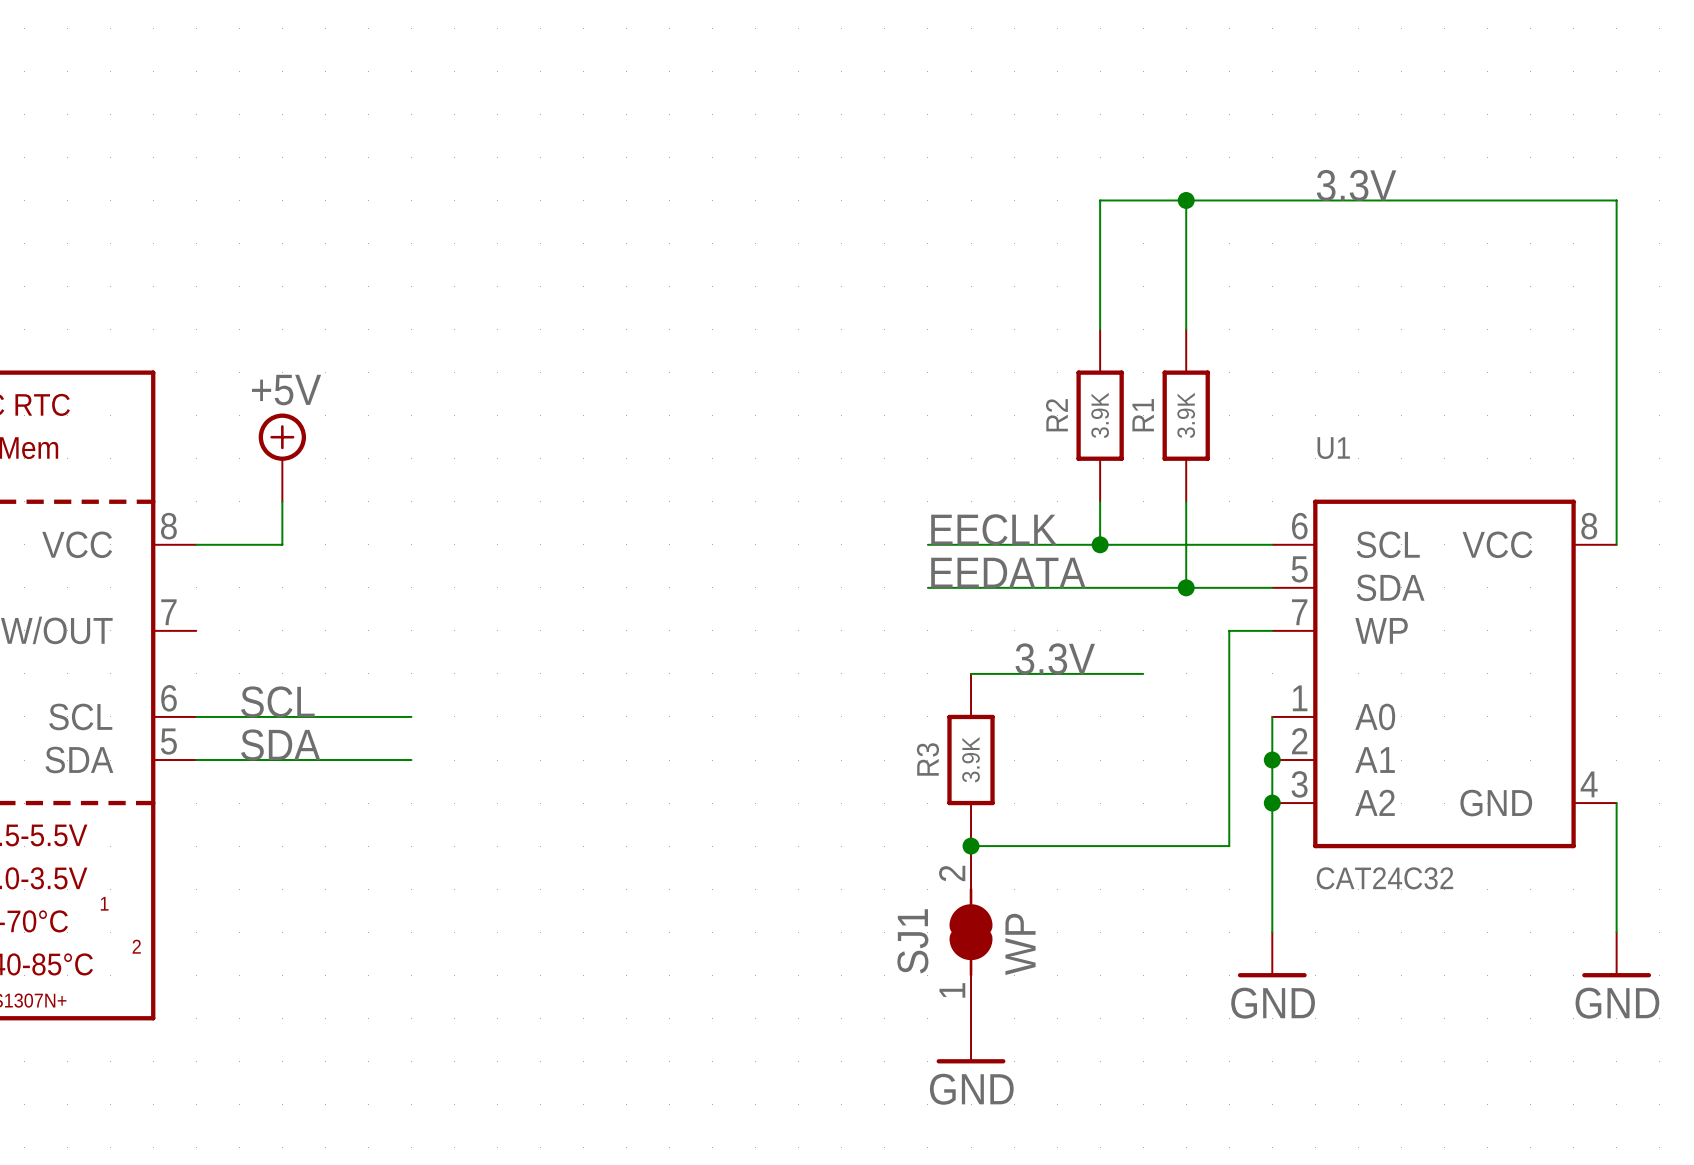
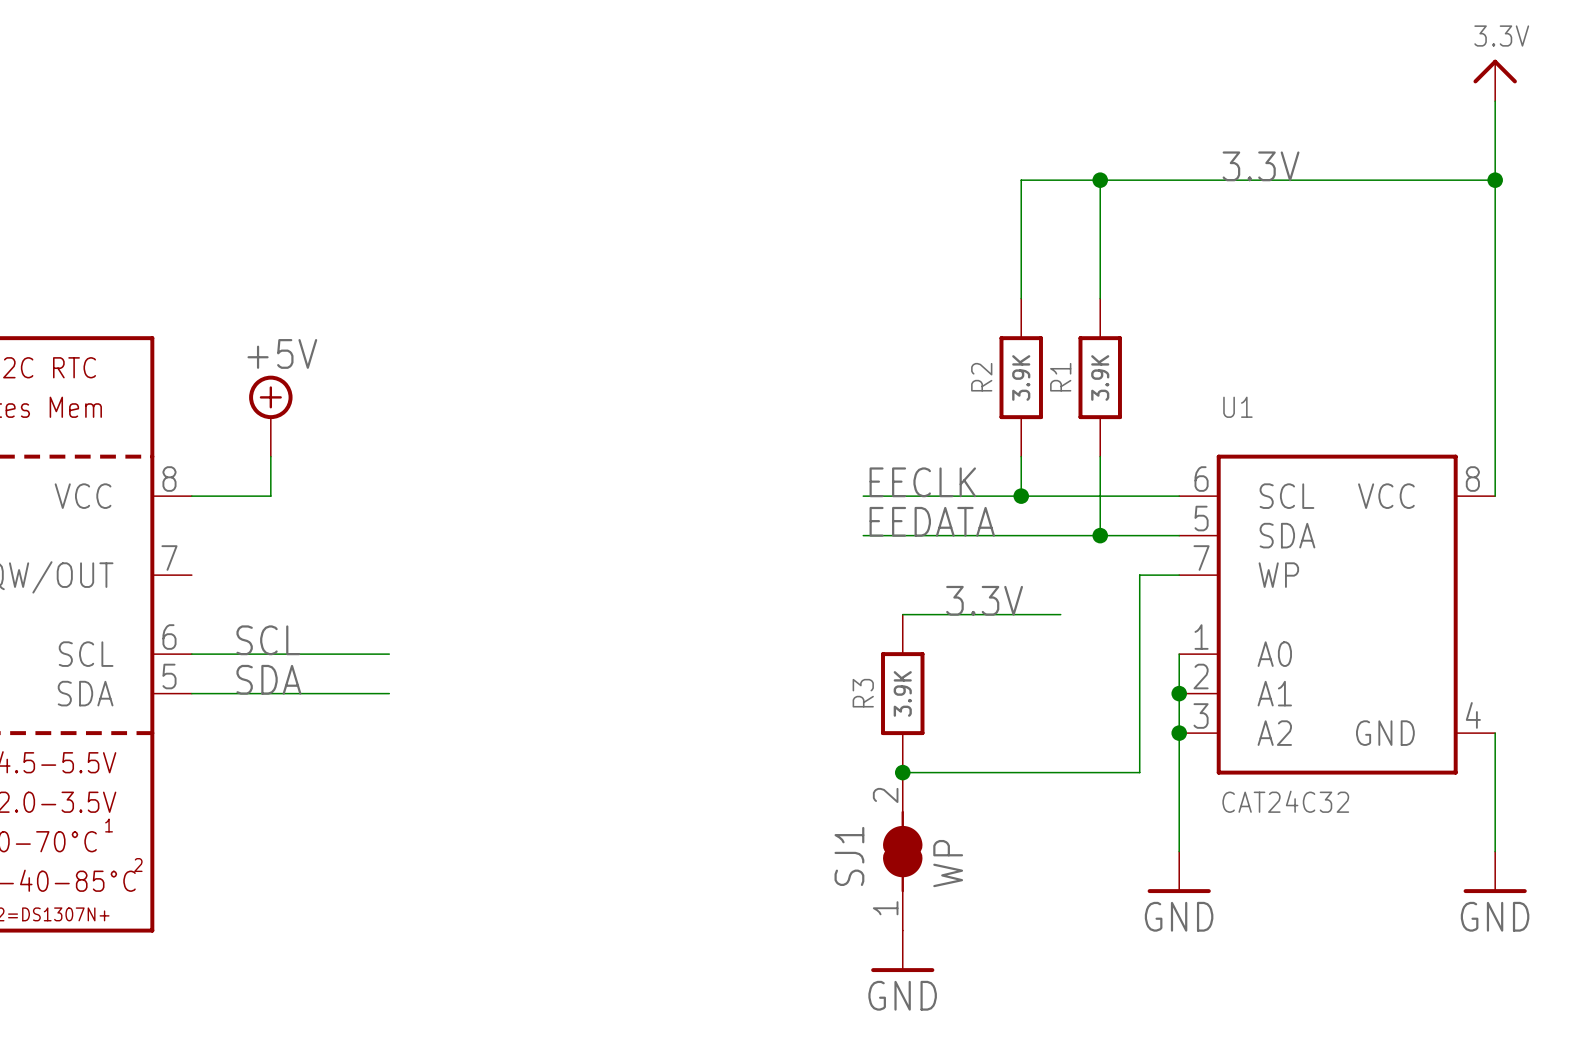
power symbol: none -> 3.3V (1495, 80)
wire: none -> (1495, 101) (1495, 180)
junction: none -> (1495, 180)

